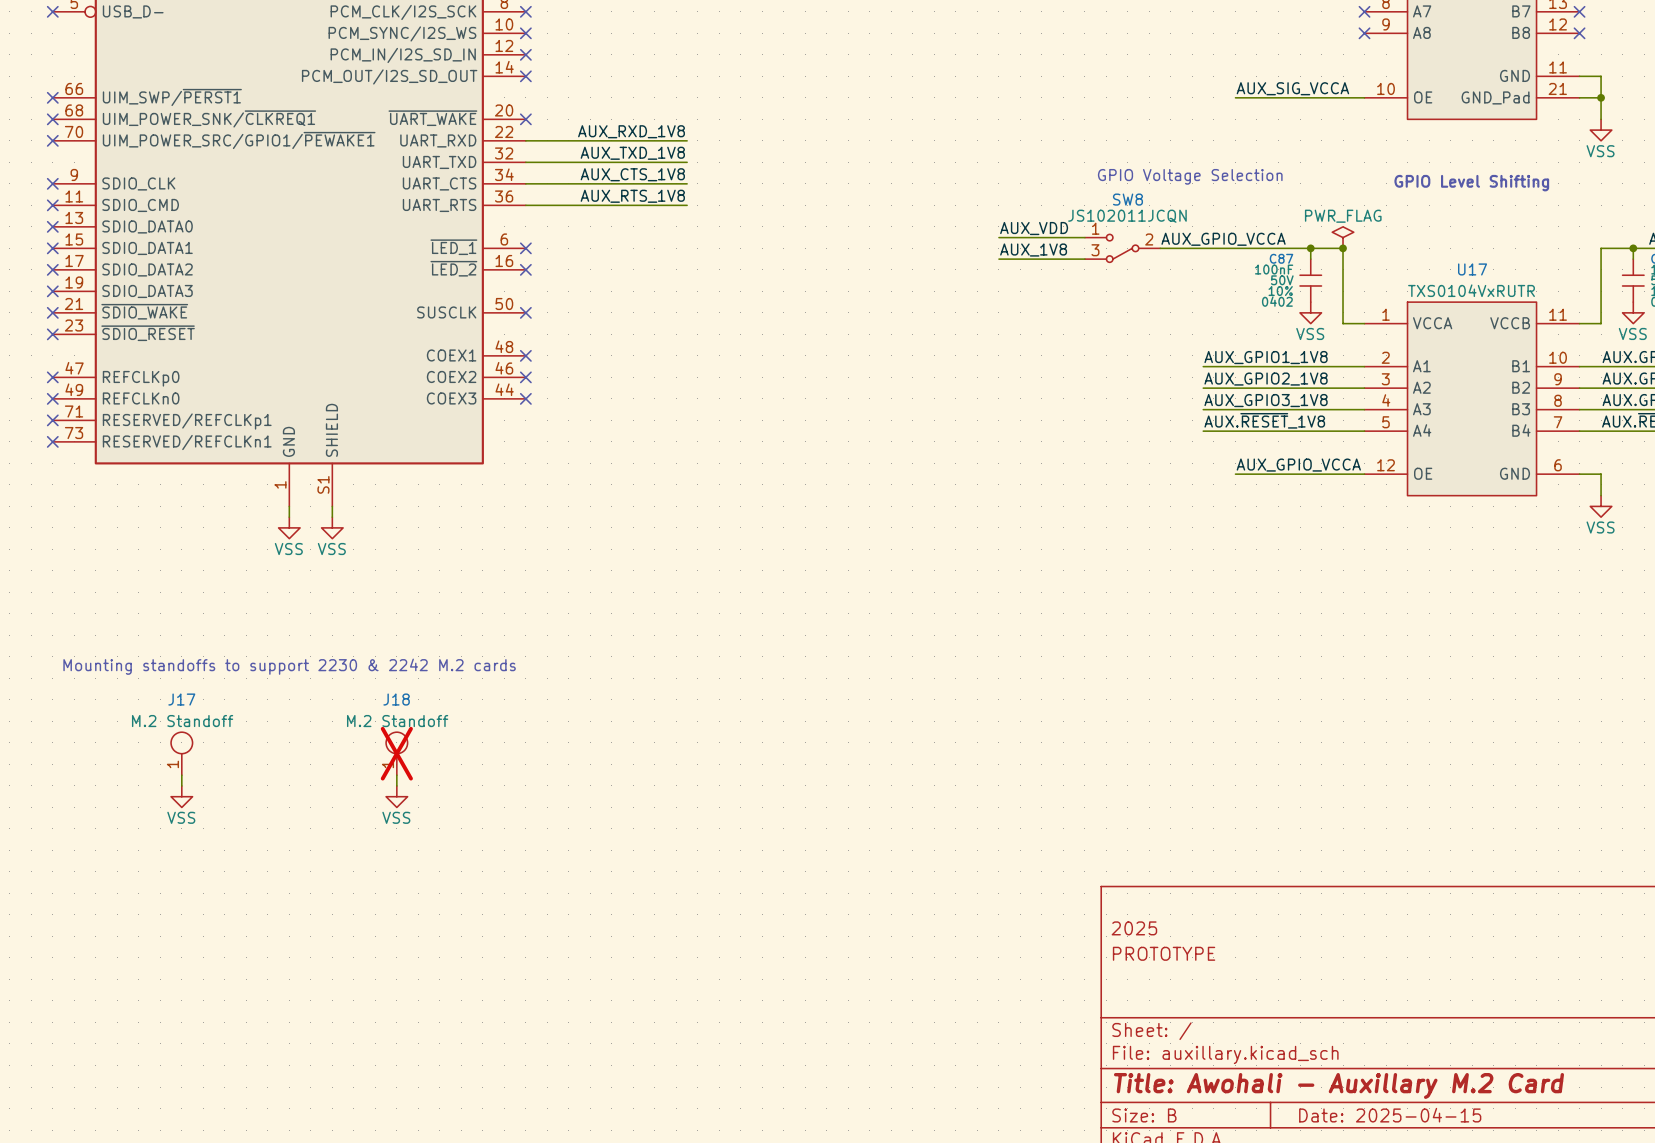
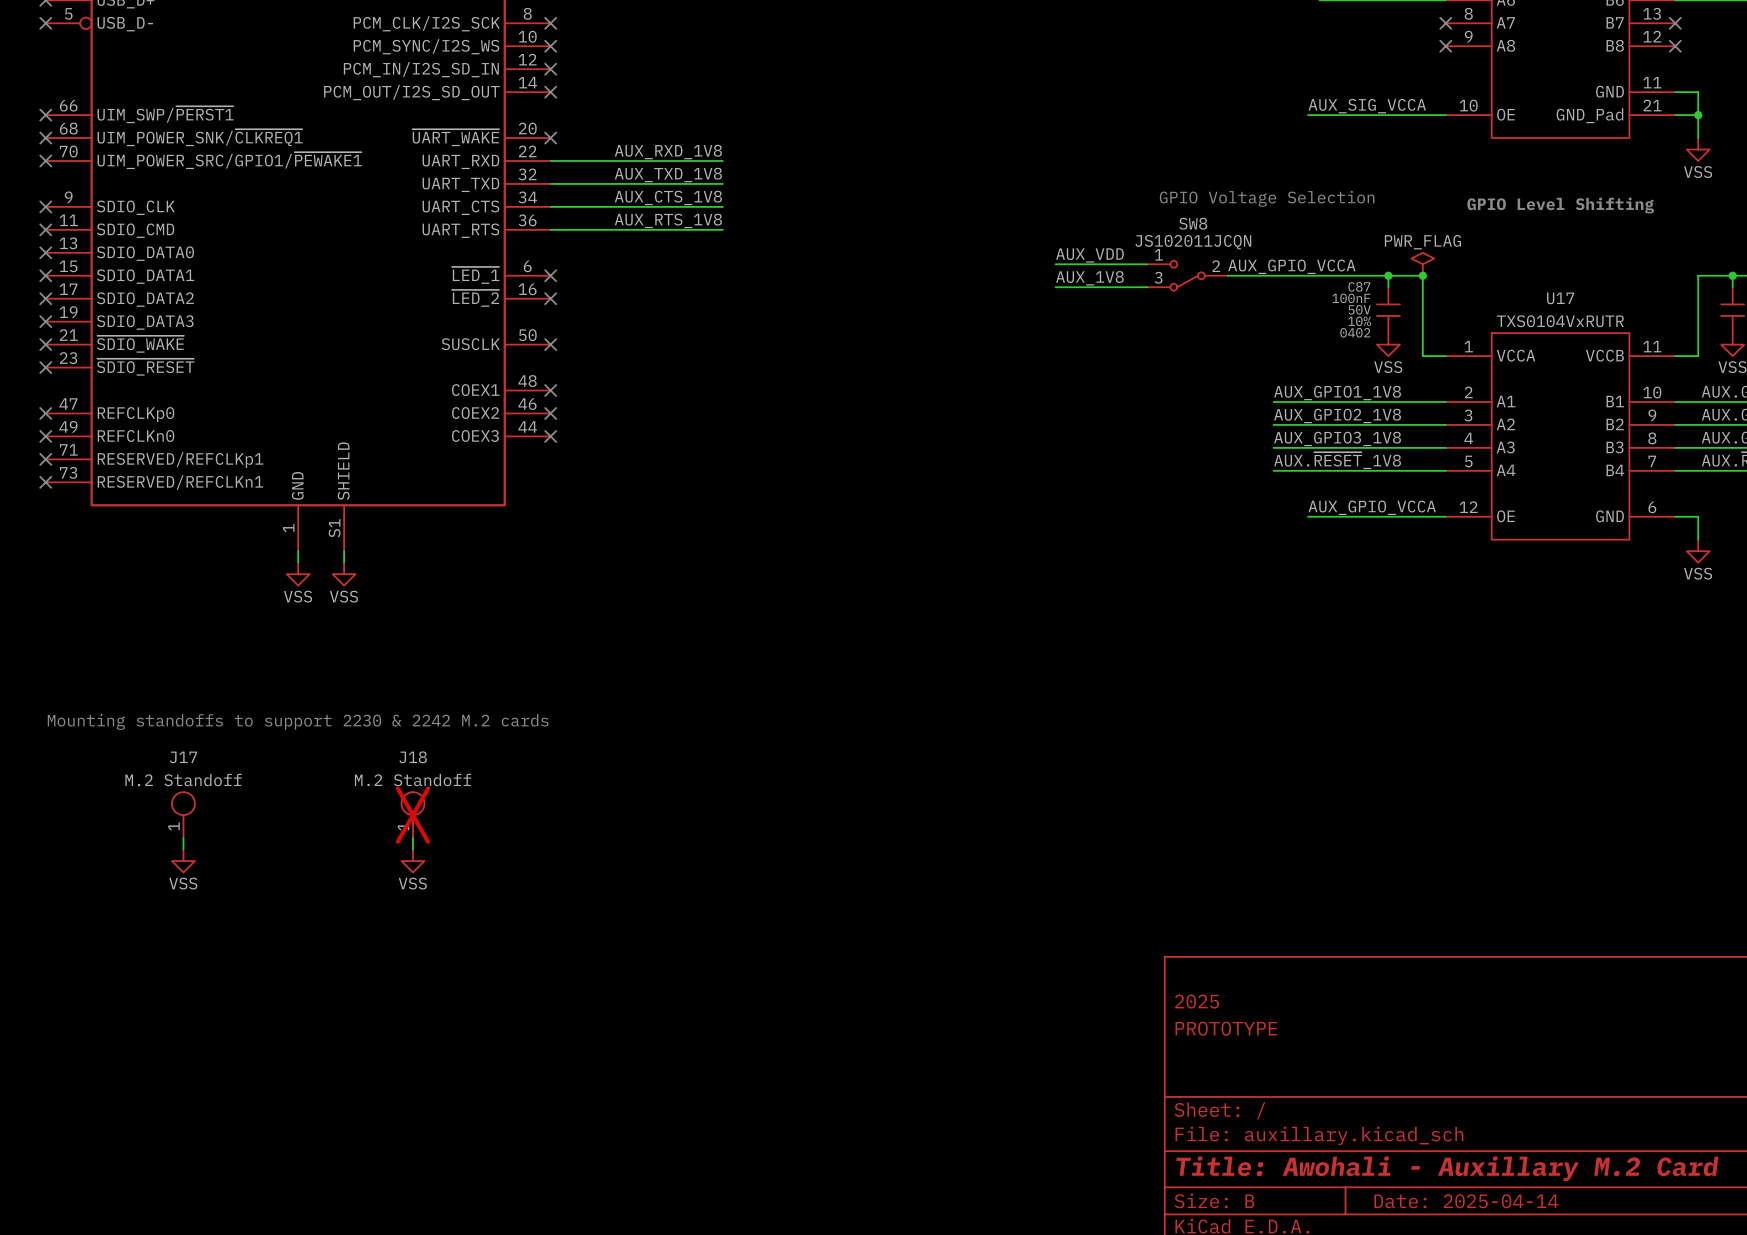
title block: Date: 2025-04-15 (1390, 1115) -> Date: 2025-04-14 (1466, 1201)

